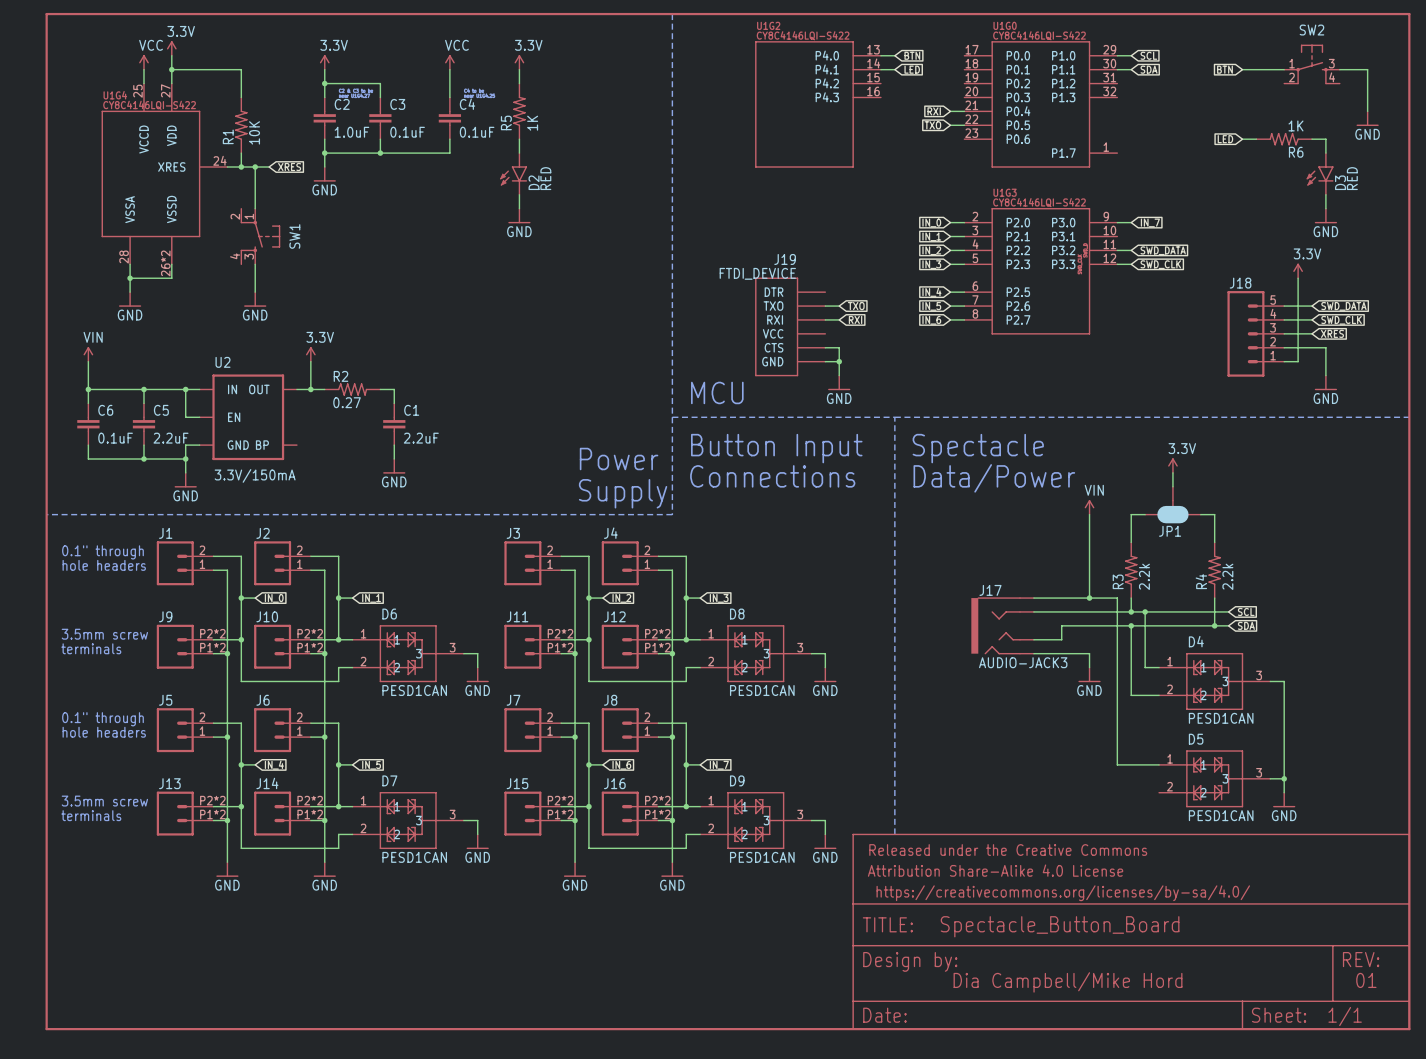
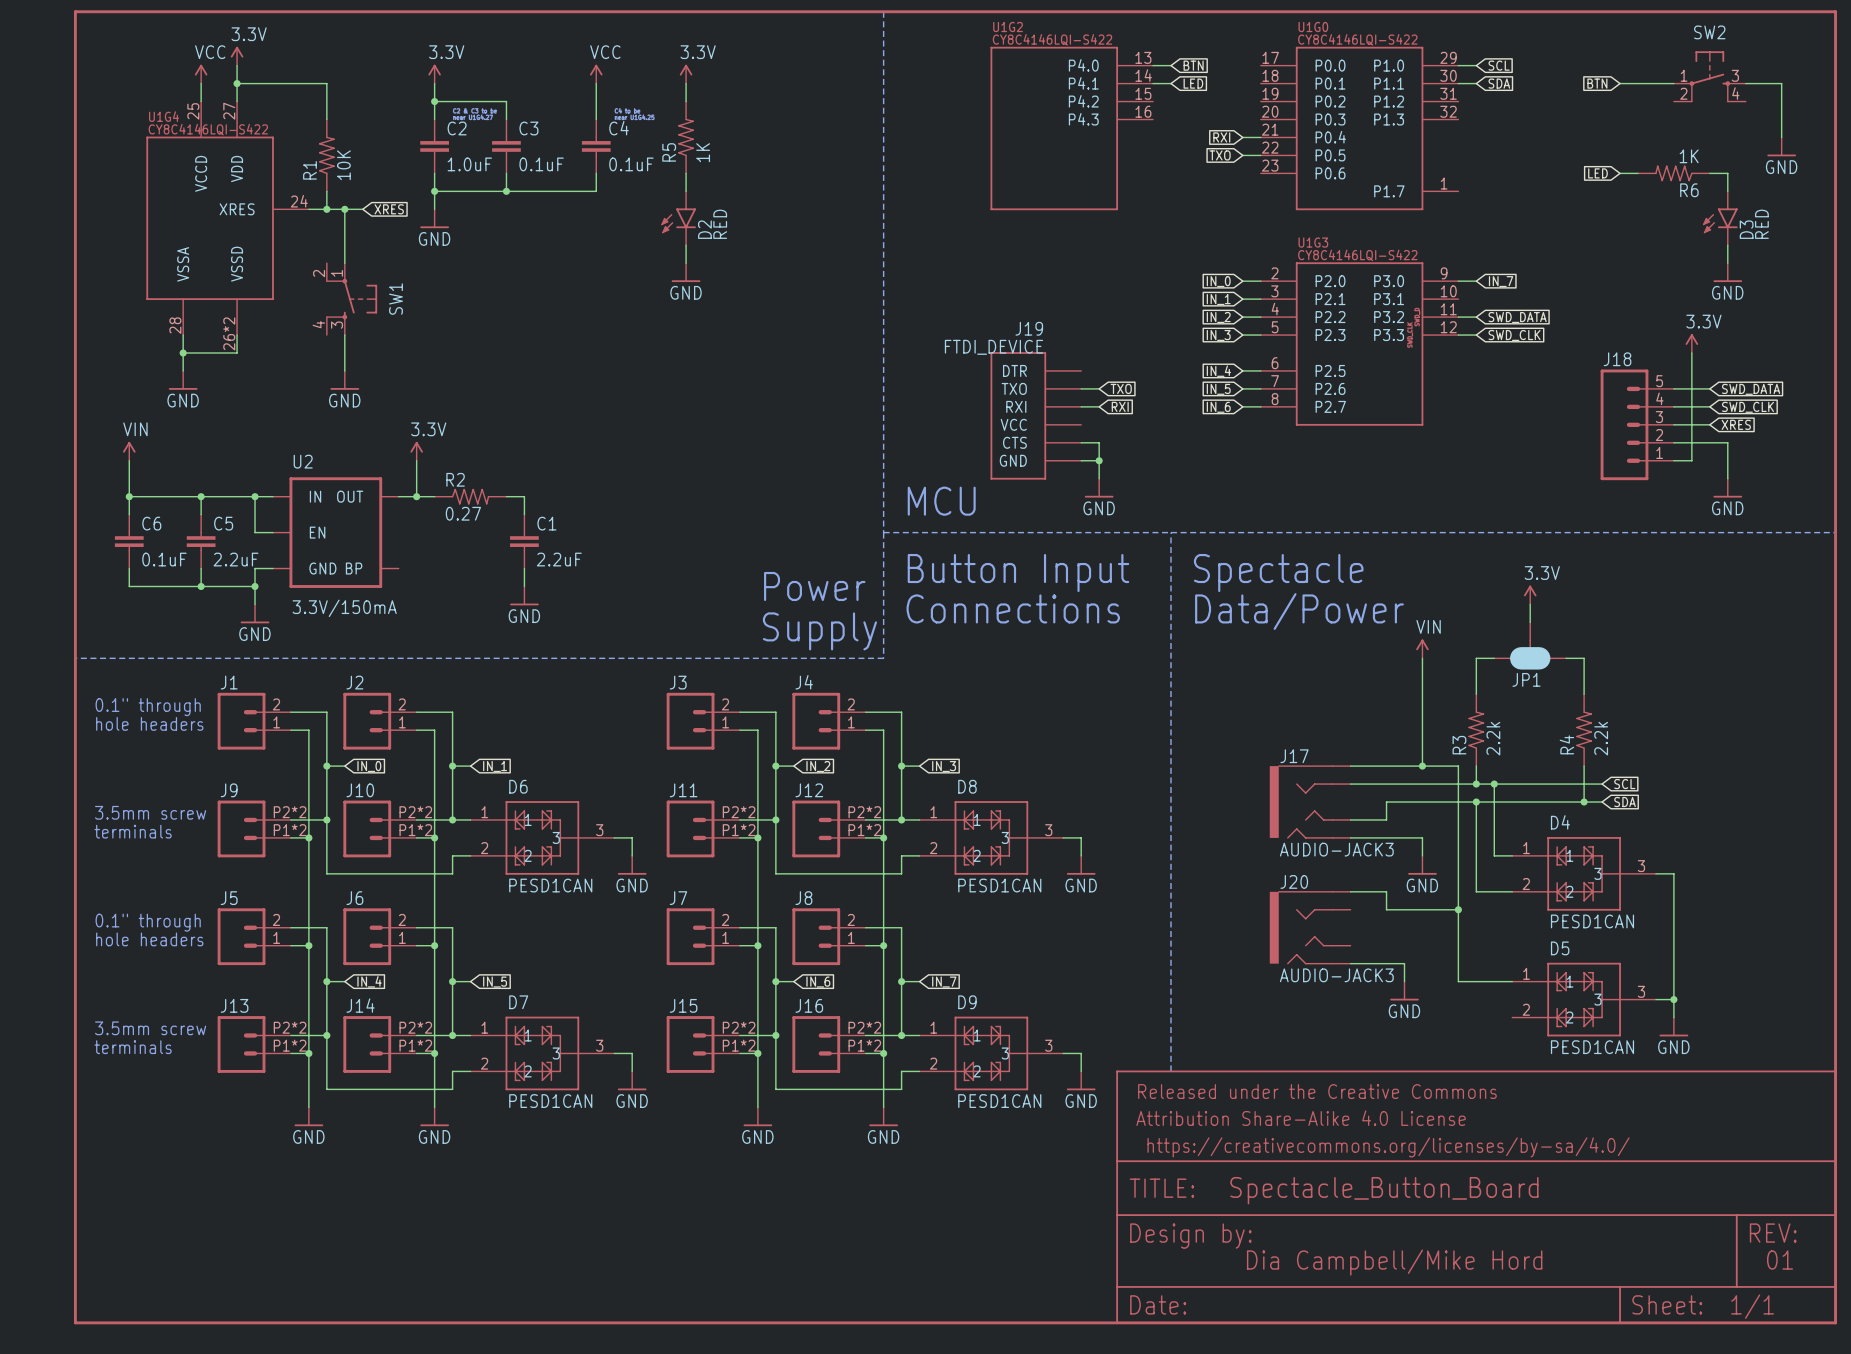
wire: none -> (1350, 891) (1386, 891) (1386, 909) (1458, 909)
junction: none -> (1458, 909)
J20: none -> AUDIO-JACK3 (1310, 927)
wire: none -> (1350, 963) (1404, 963) (1404, 981)
power symbol: none -> GND (1404, 991)

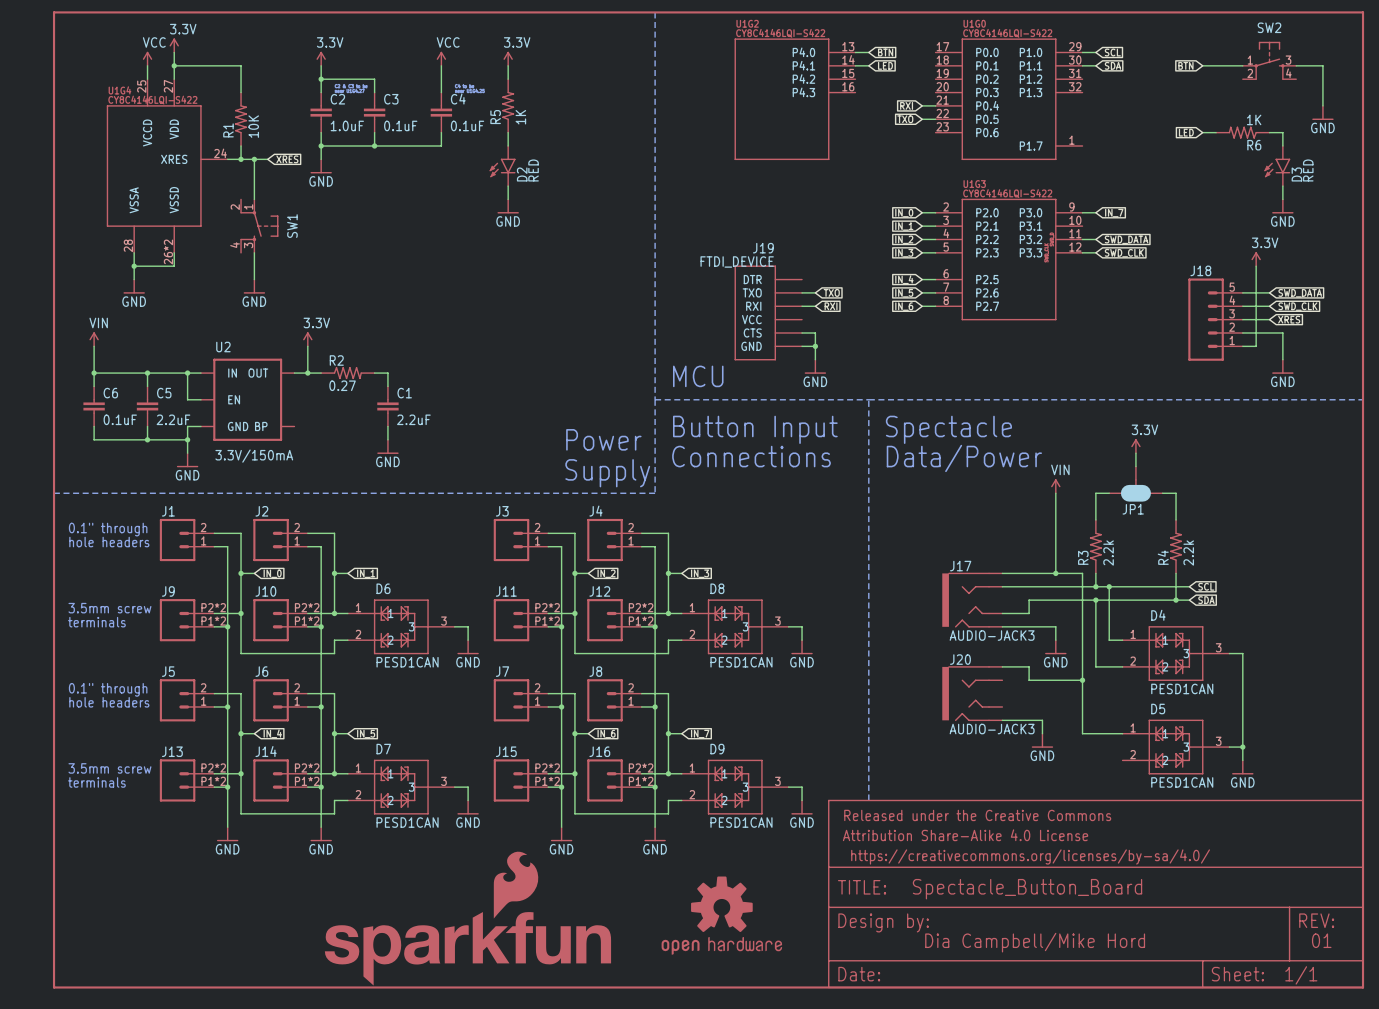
part: none -> (721, 915)
part: none -> (467, 918)

